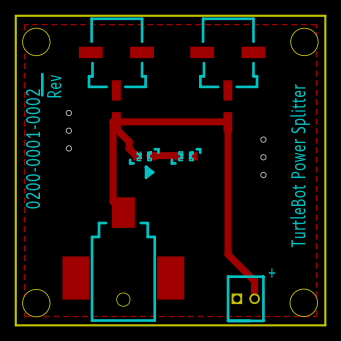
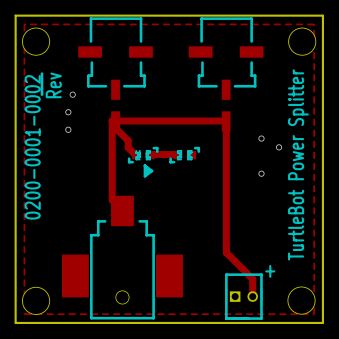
via: none -> (72, 94)
via: (68, 148) -> none
via position: (263, 157) -> (279, 147)

